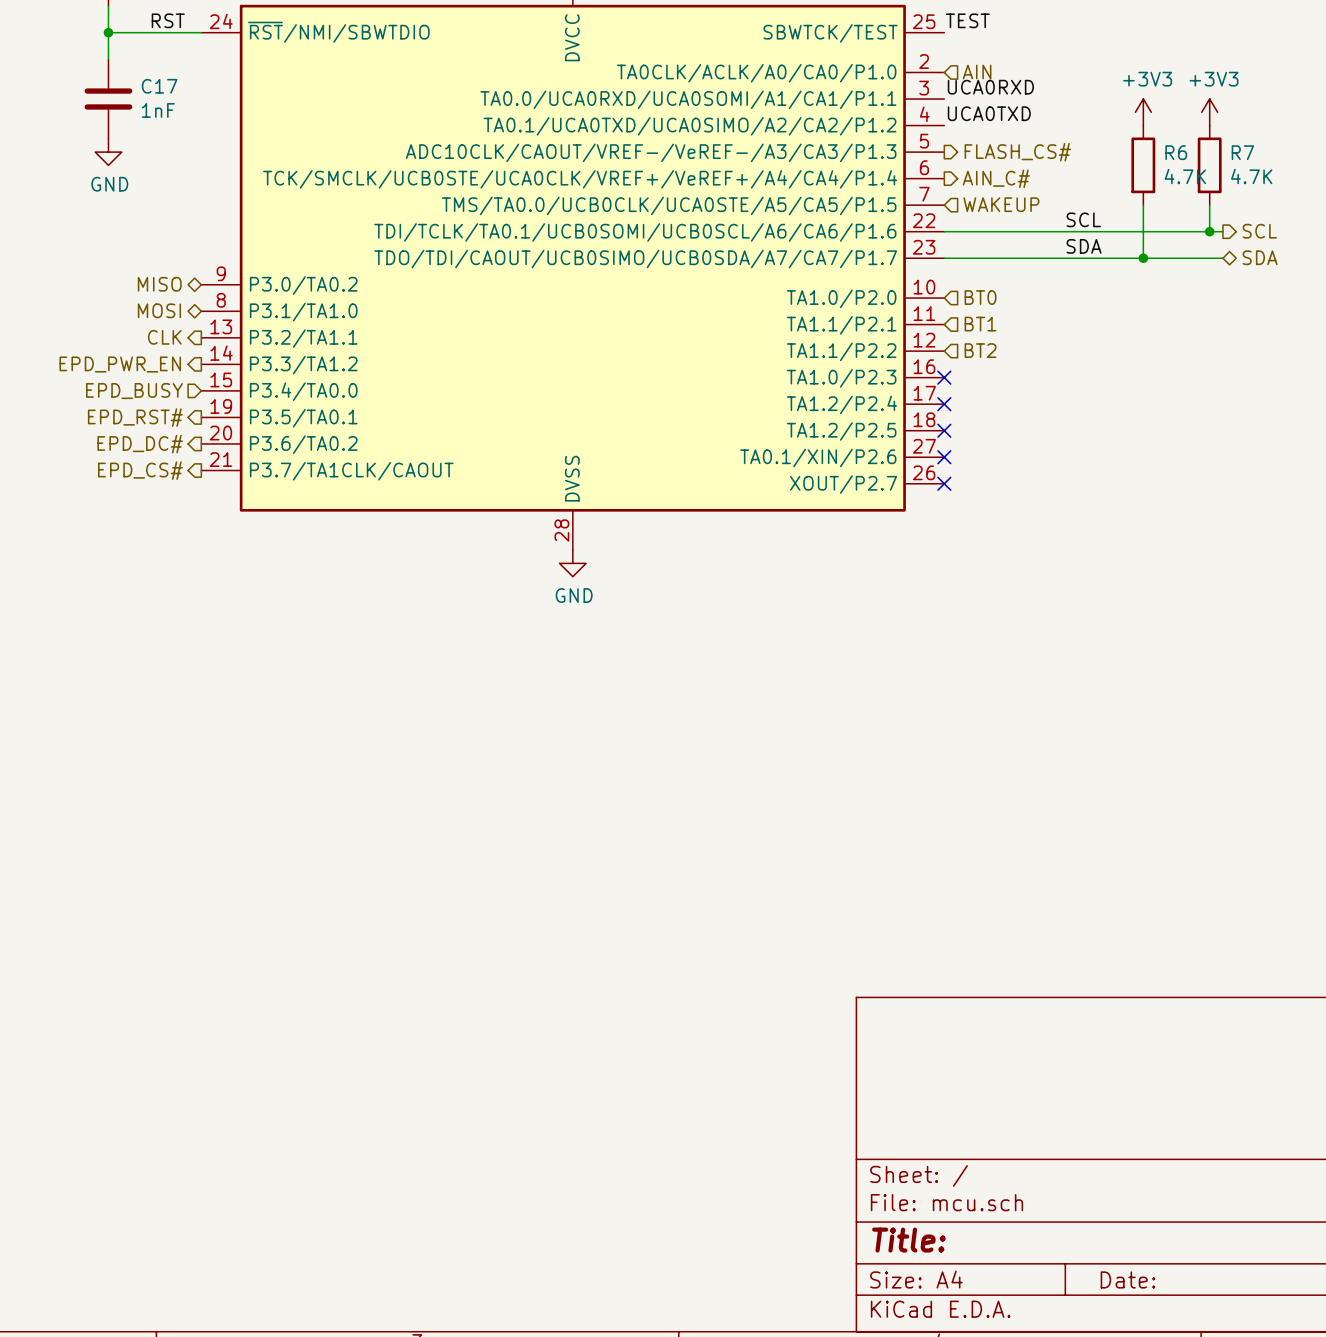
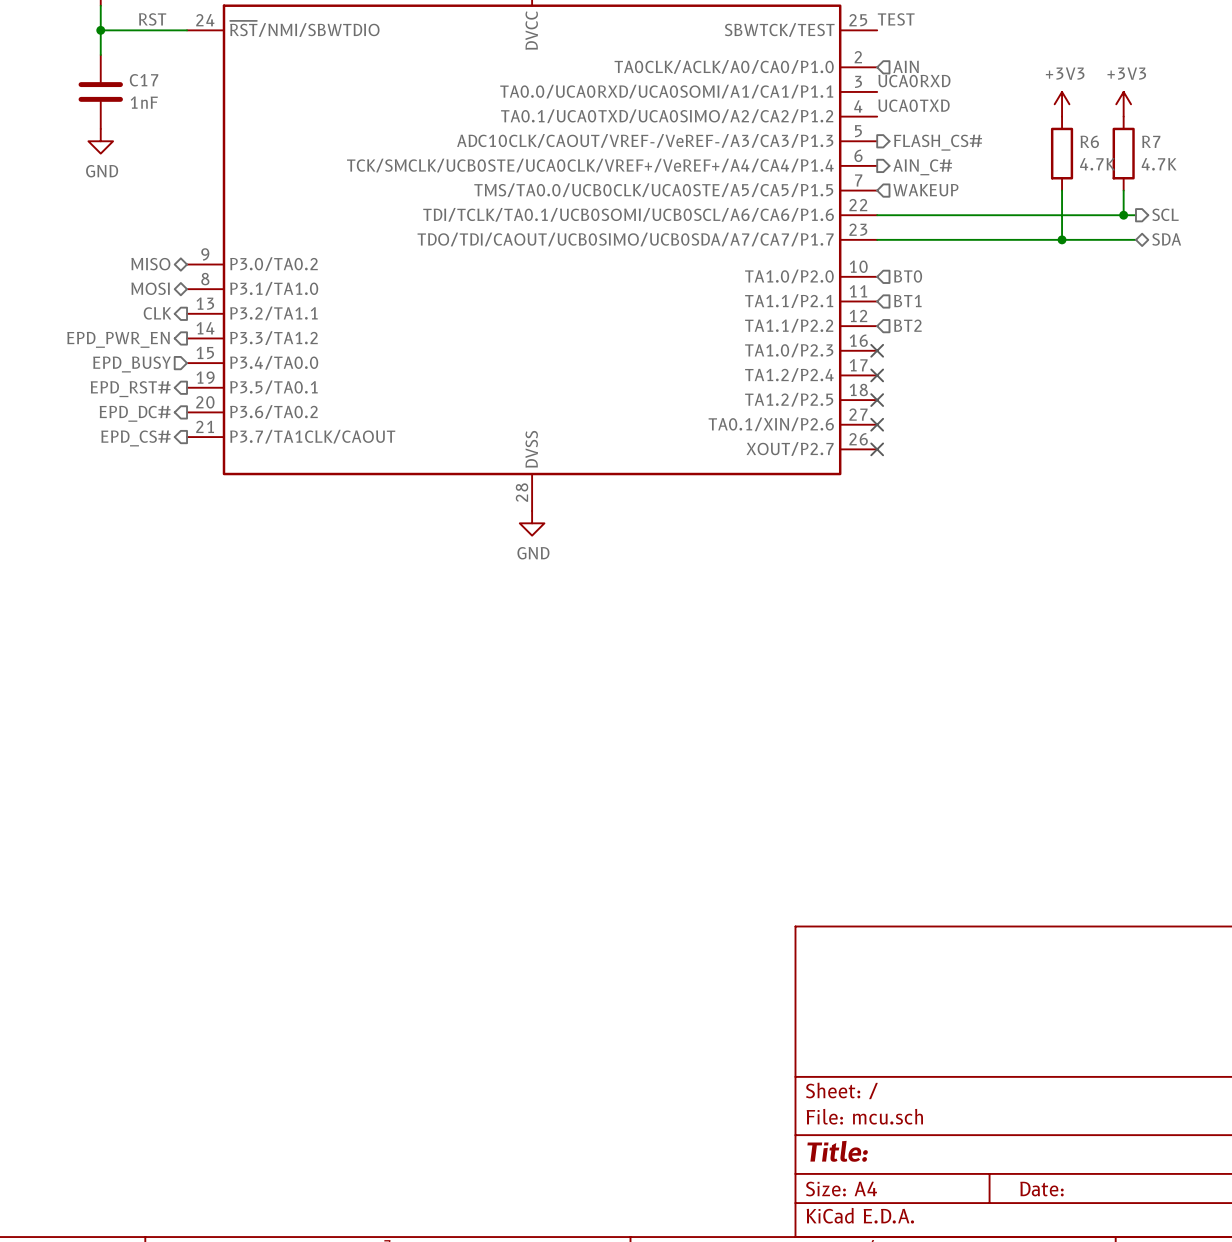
label: SCL (1083, 219) -> none
label: SDA (1084, 246) -> none

